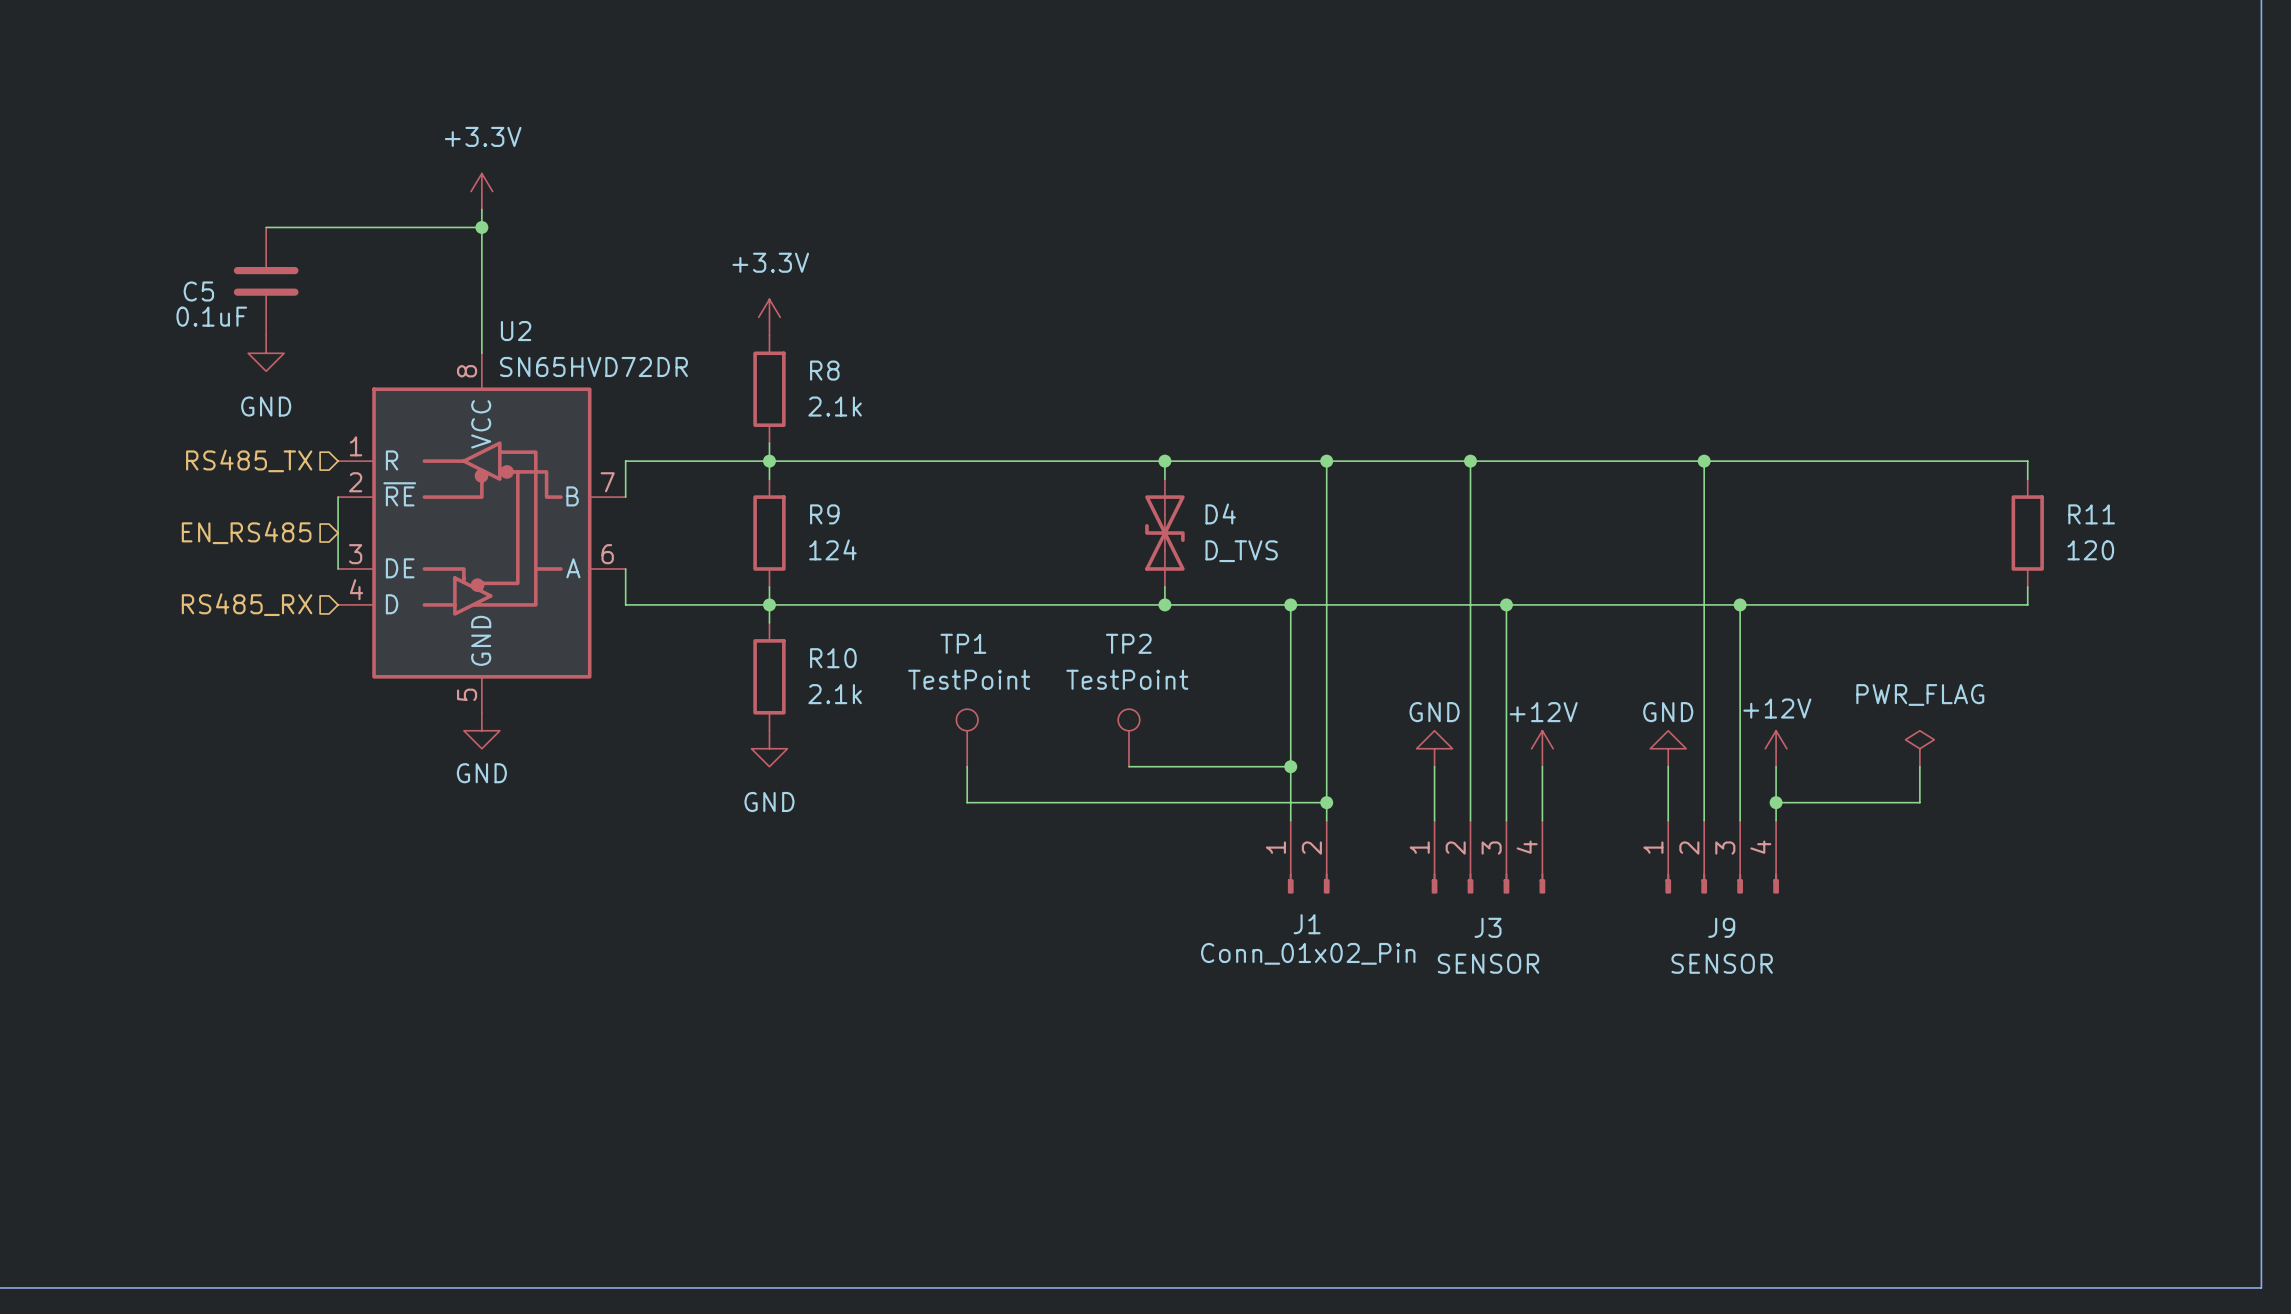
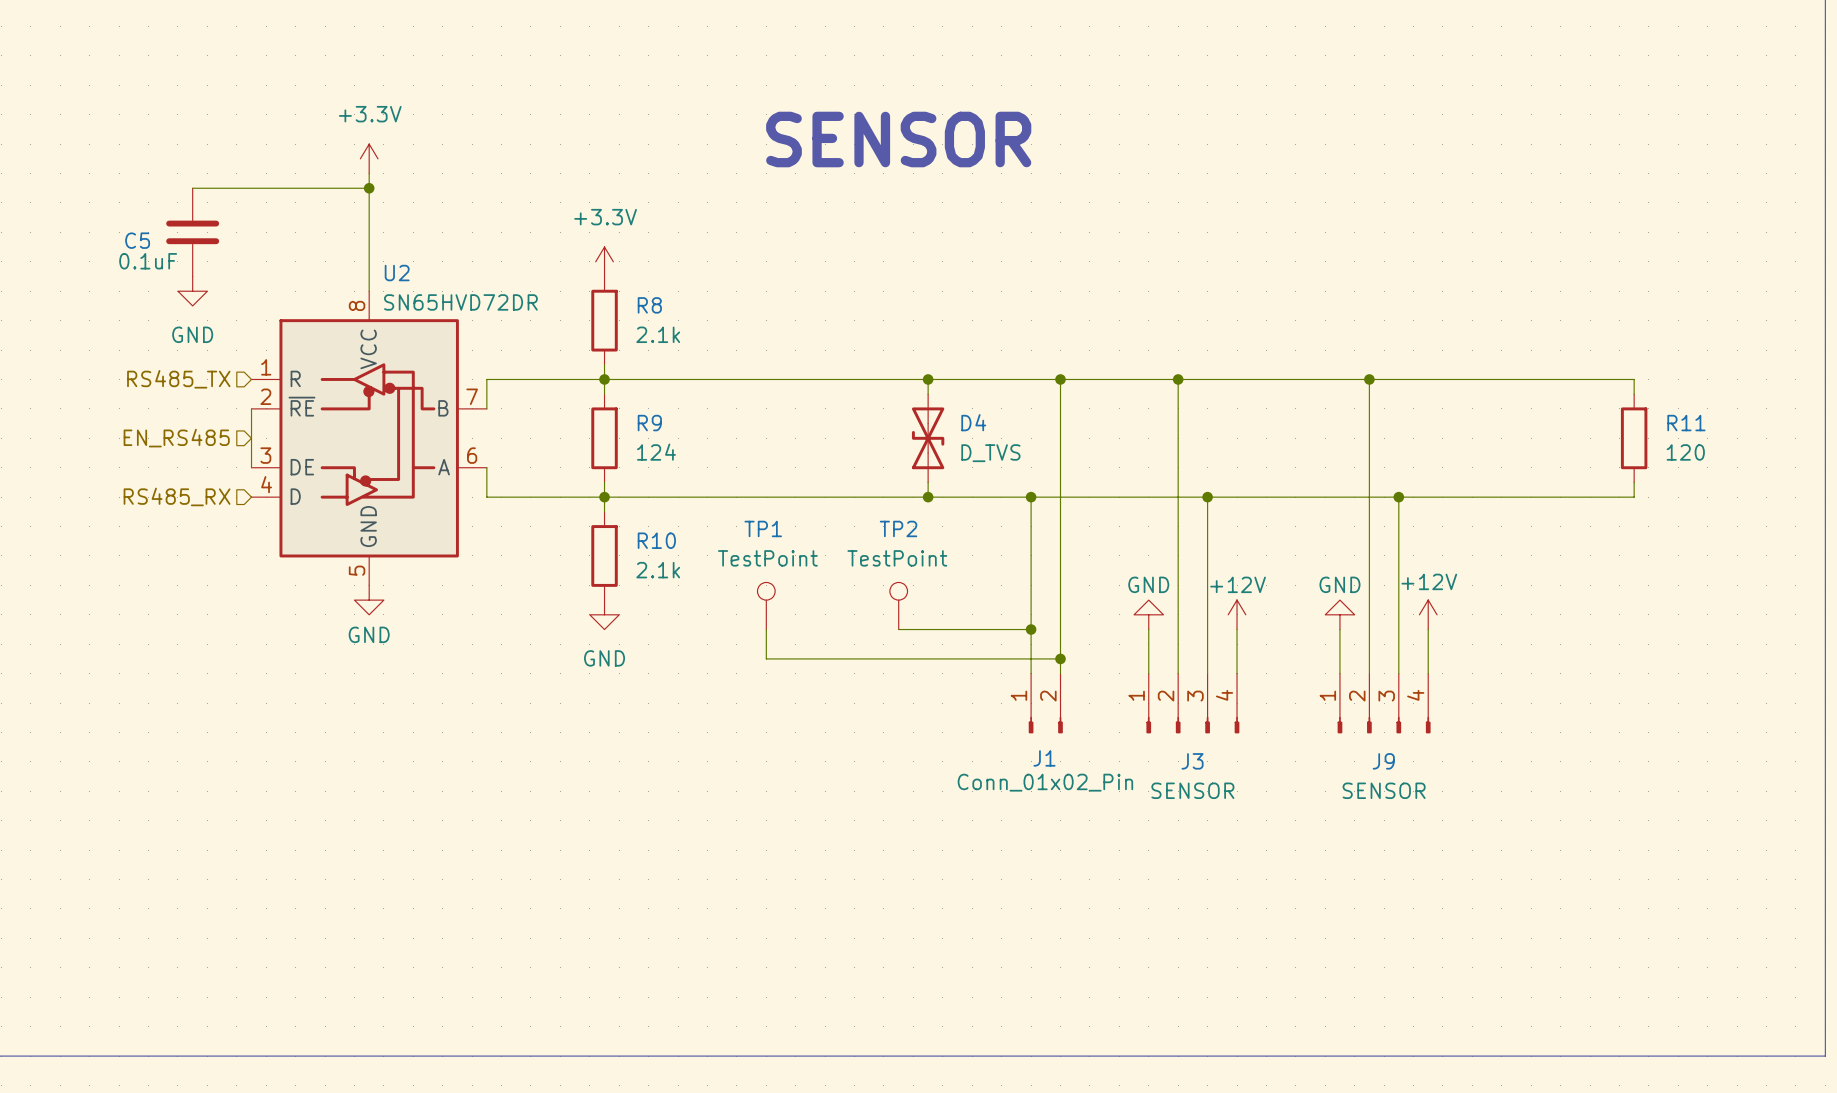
text: none -> SENSOR (898, 139)
power symbol: PWR_FLAG (1919, 748) -> none
wire: (1919, 766) (1919, 802) (1776, 802) -> none
junction: (1776, 802) -> none

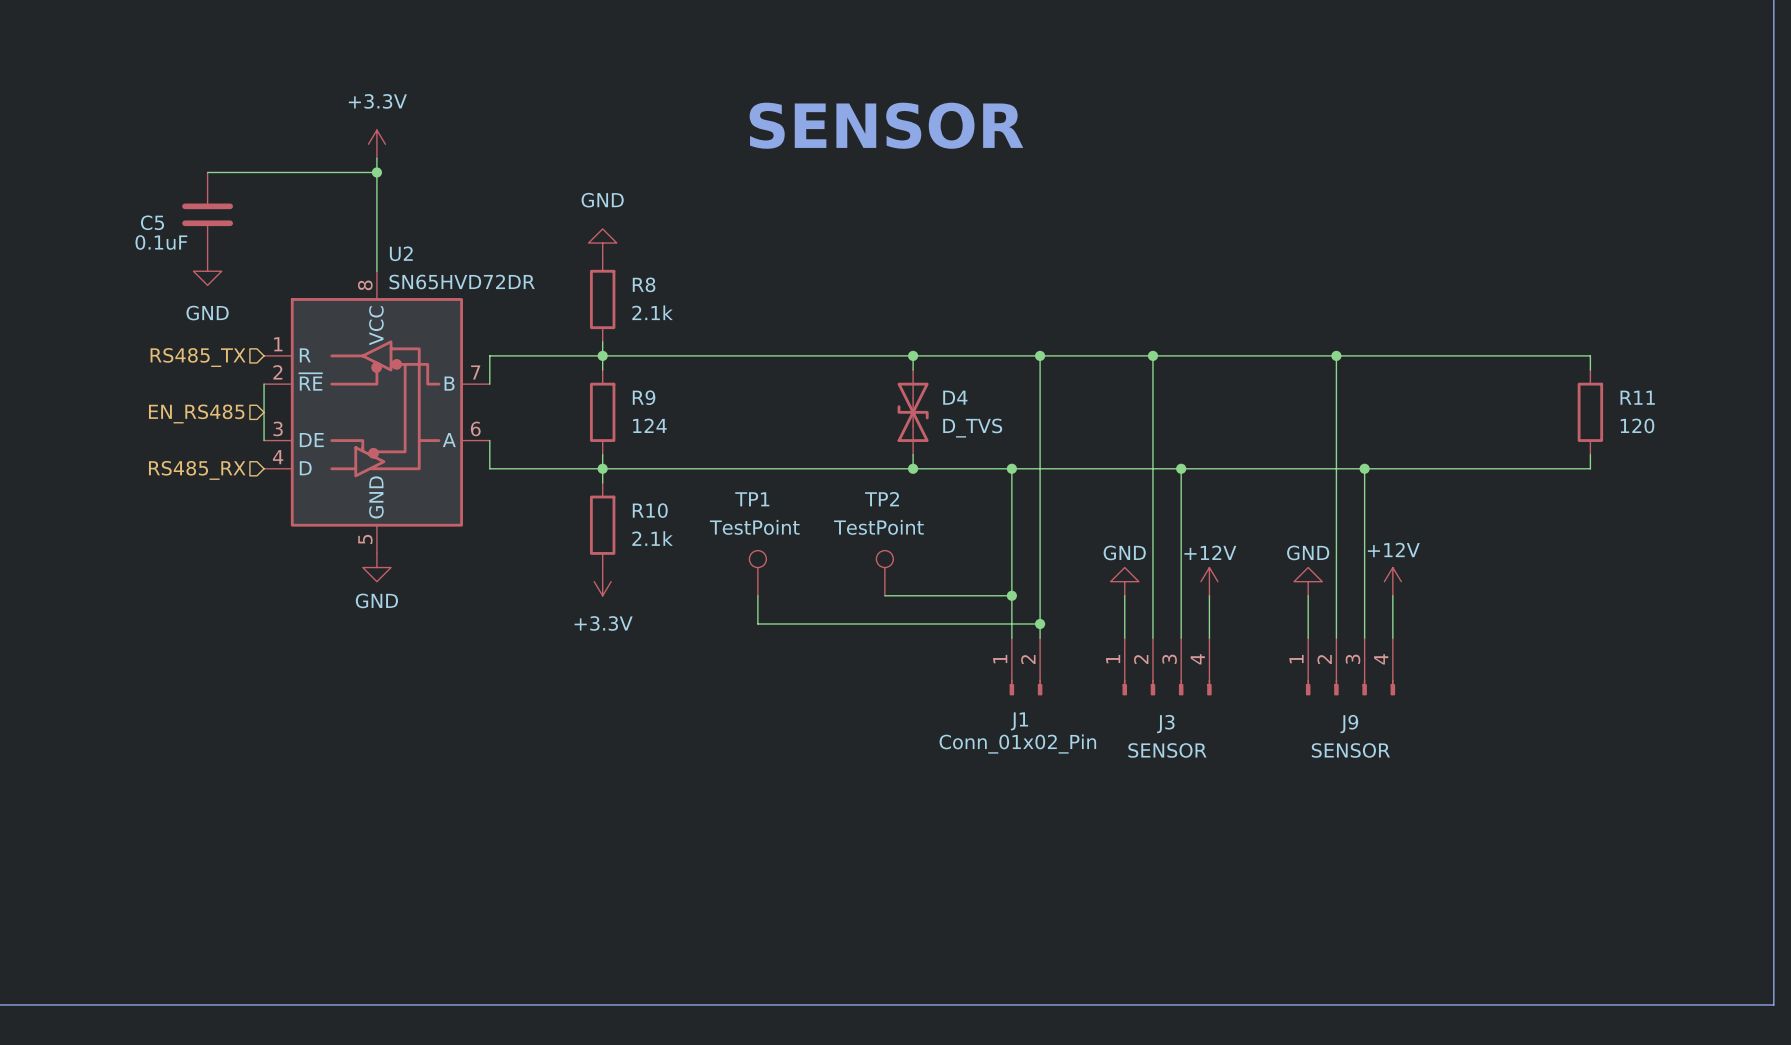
power symbol: +3.3V (604, 261) -> GND (602, 243)
power symbol: GND (604, 614) -> +3.3V (602, 581)

